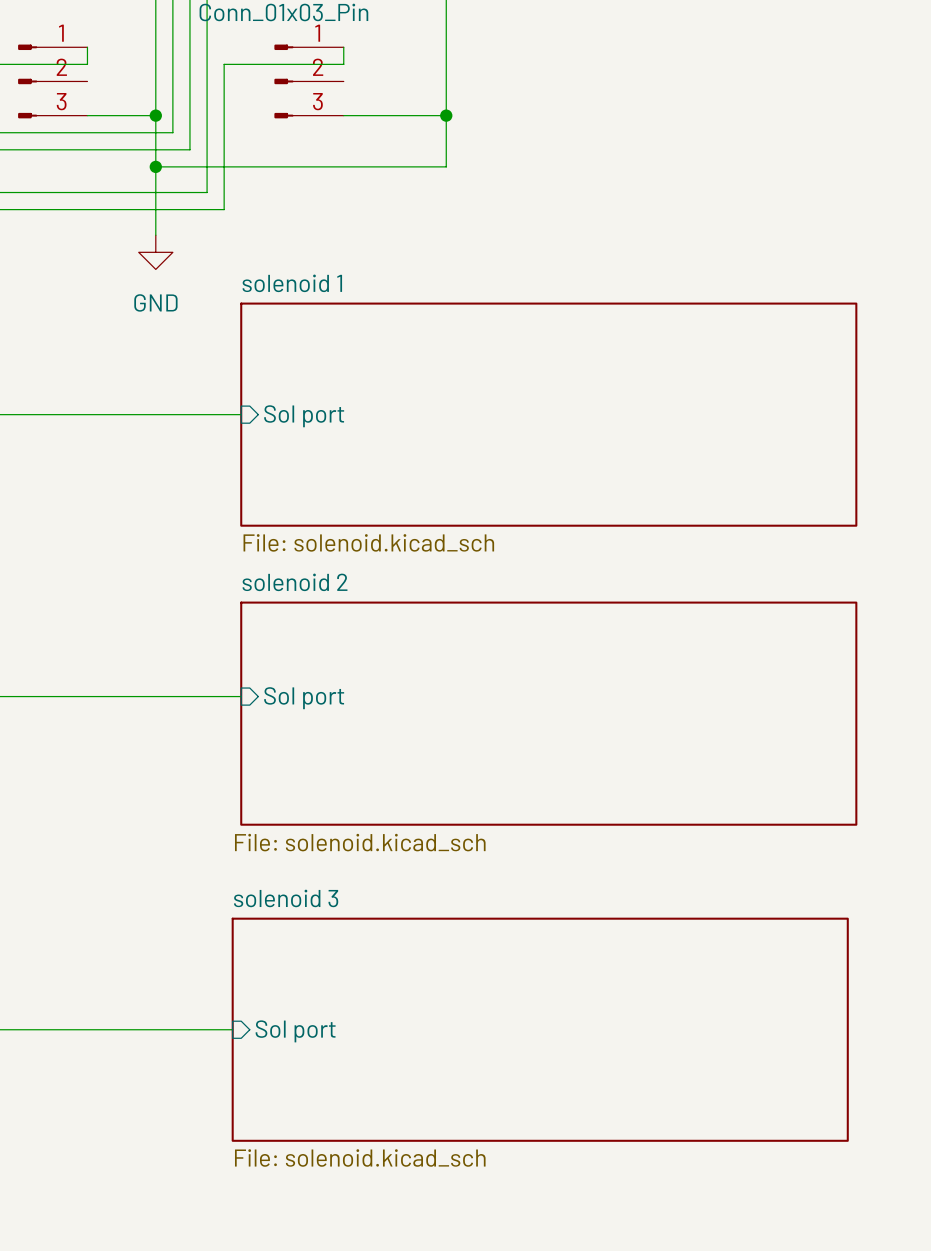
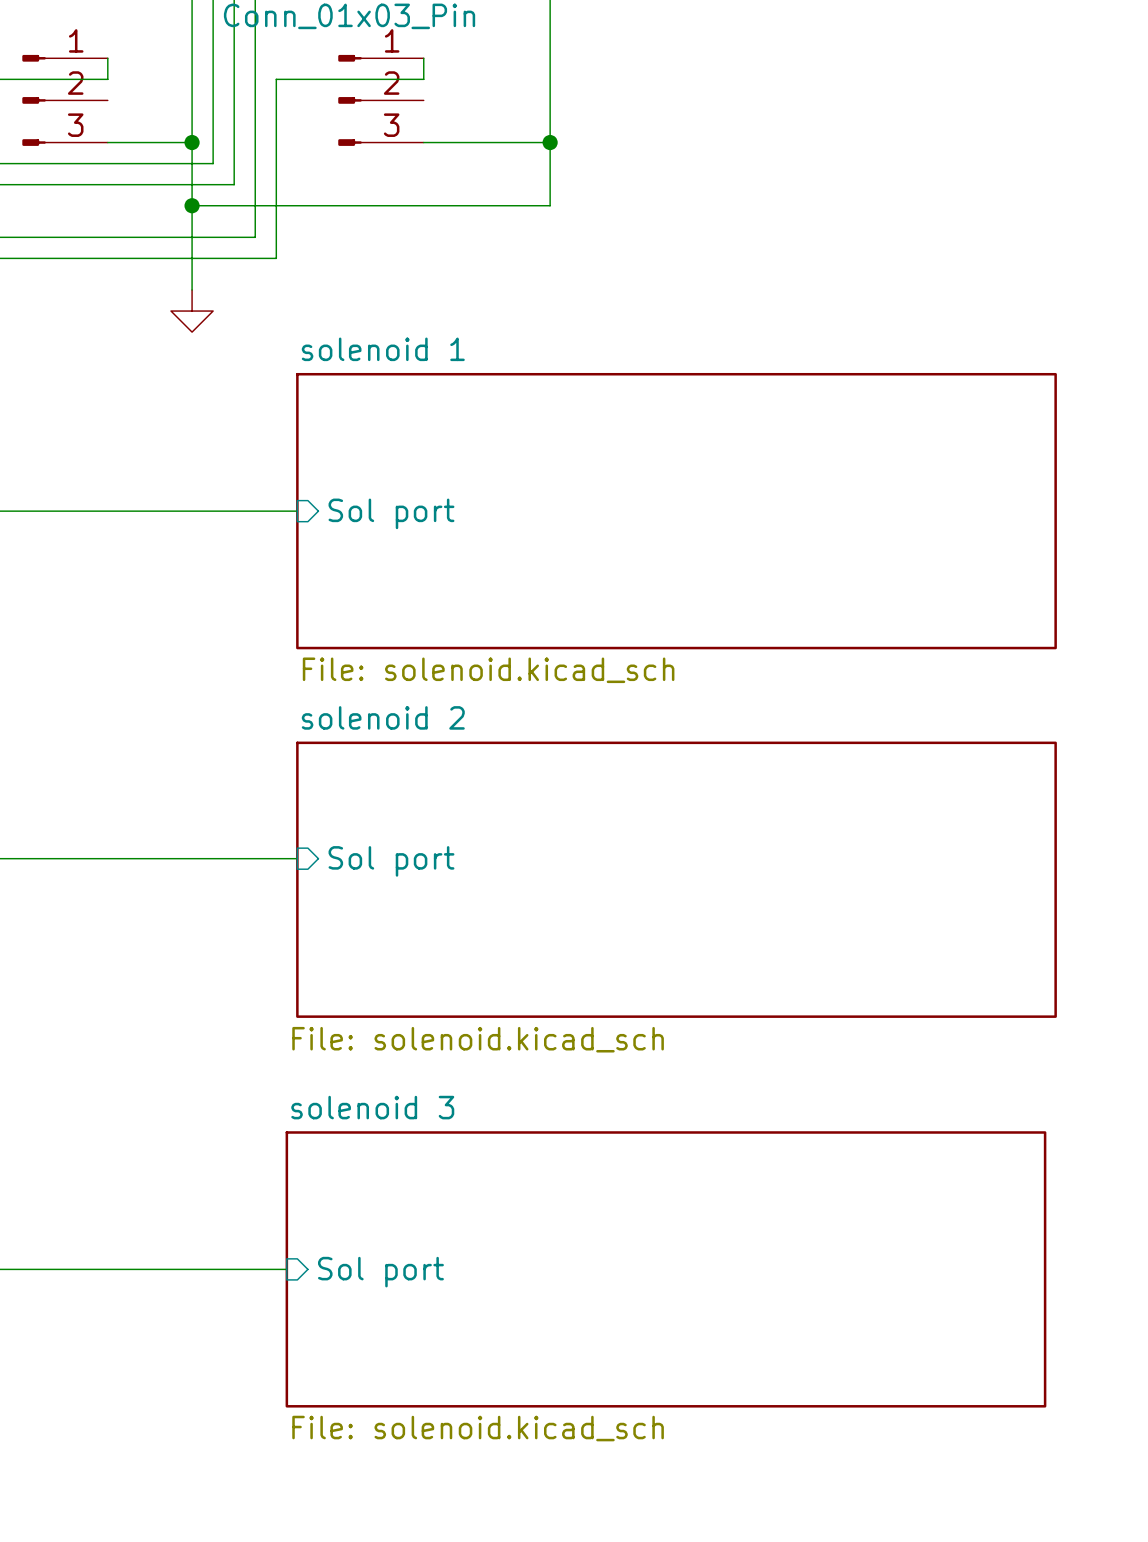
power symbol text: GND (155, 302) -> none

